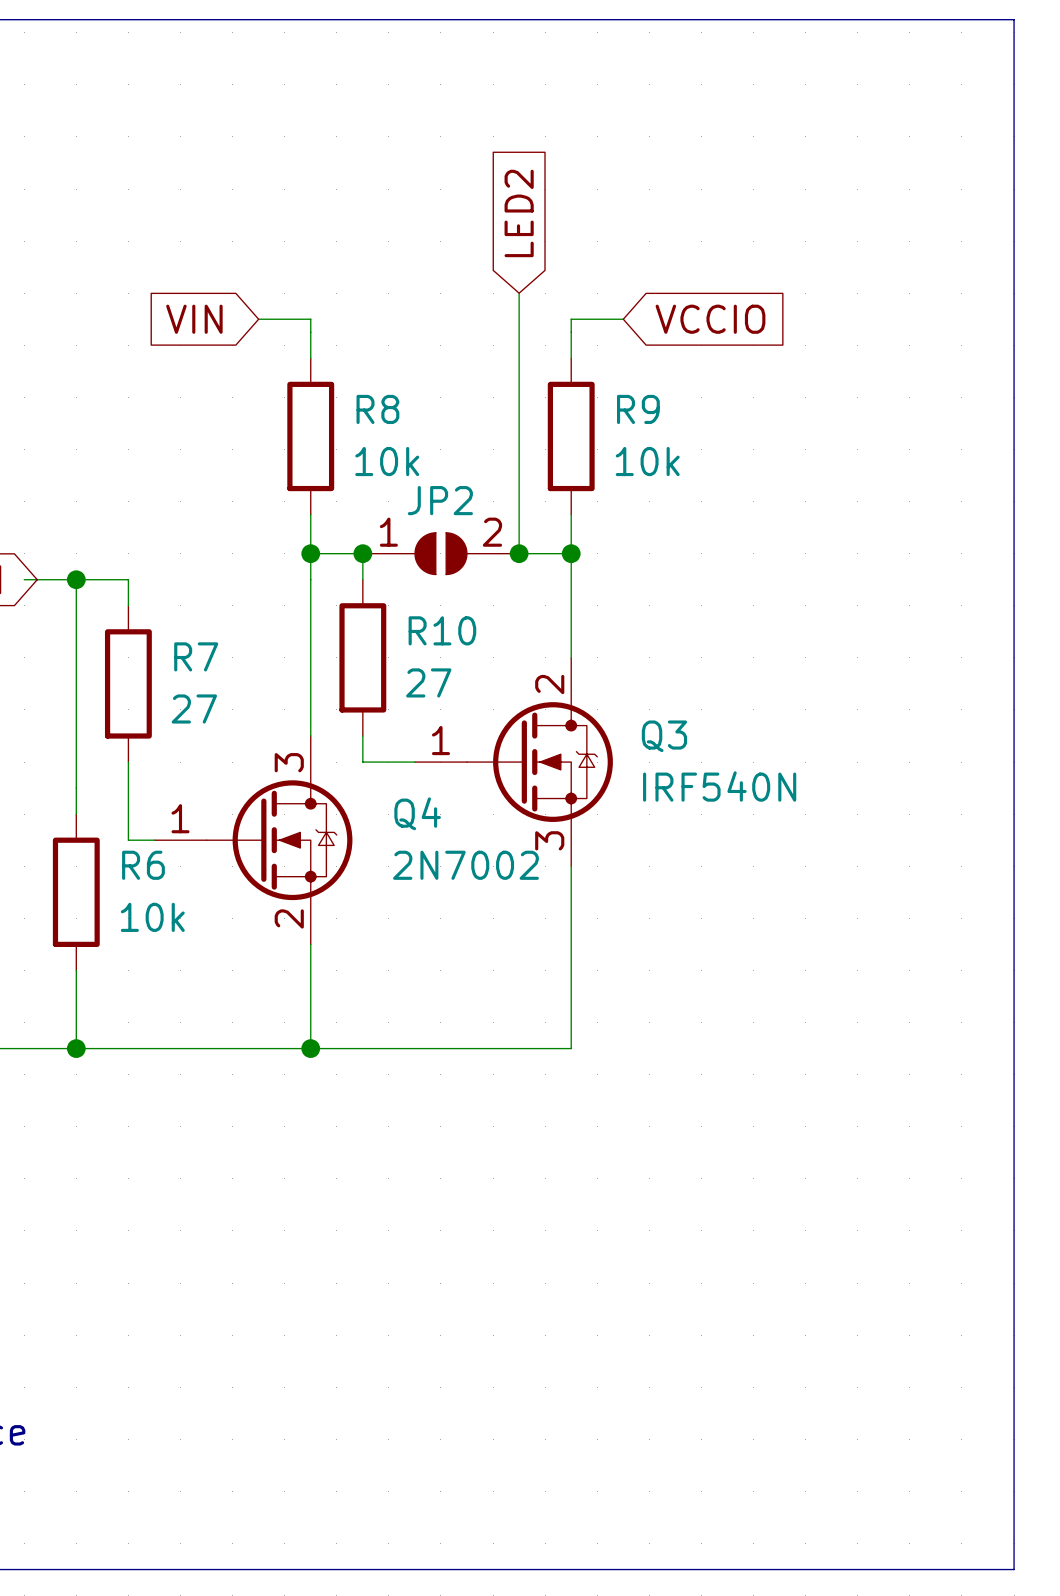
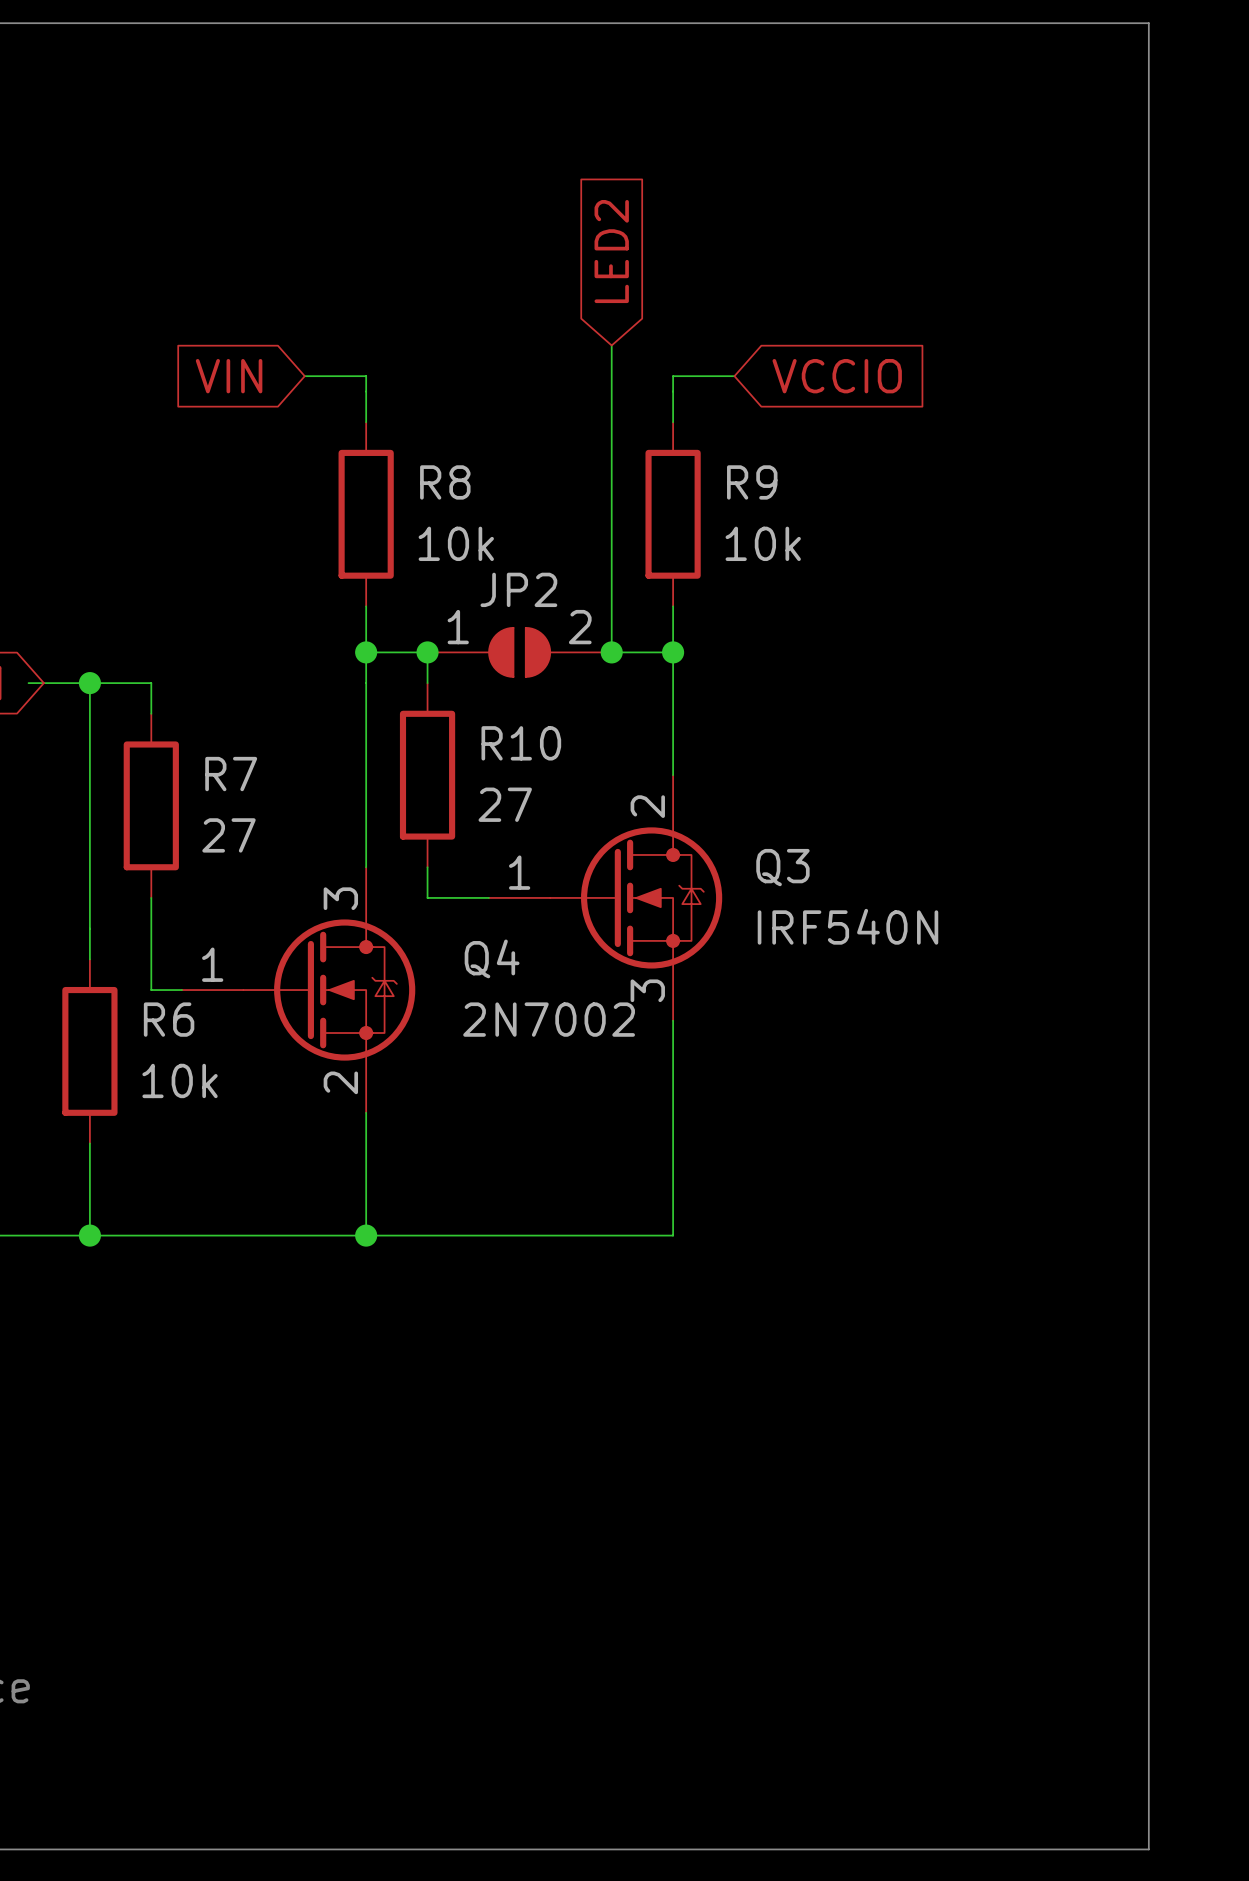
line: (974, 19) (1014, 19) (1014, 1569) (974, 1569) -> (1148, 23) (1148, 1849)

